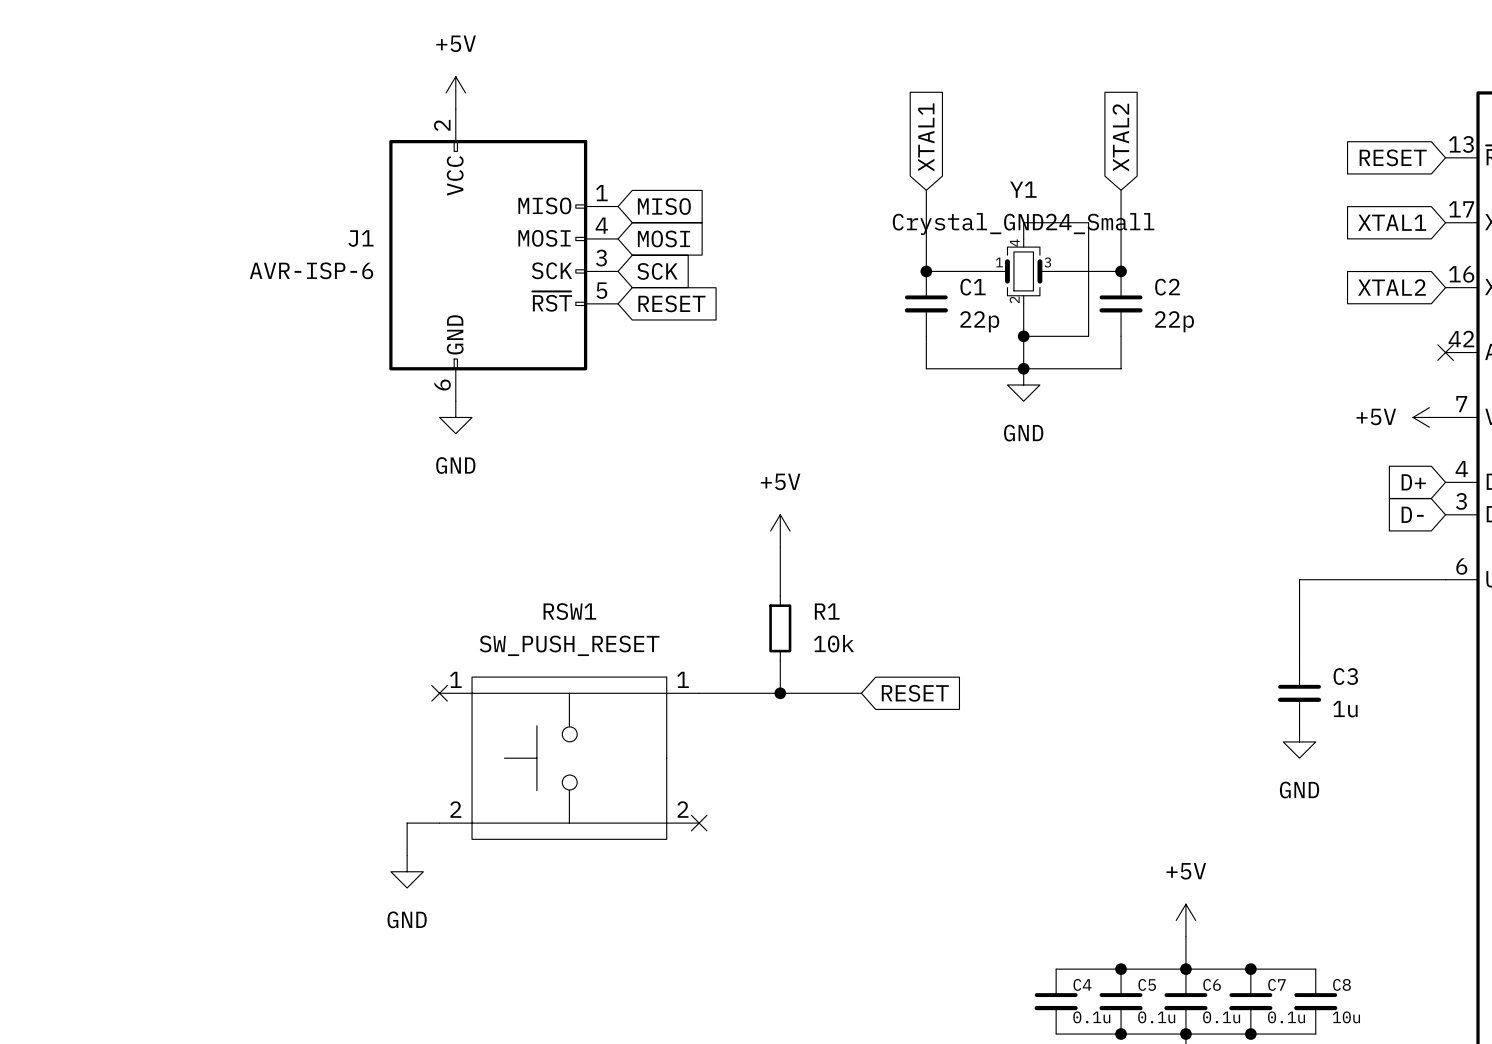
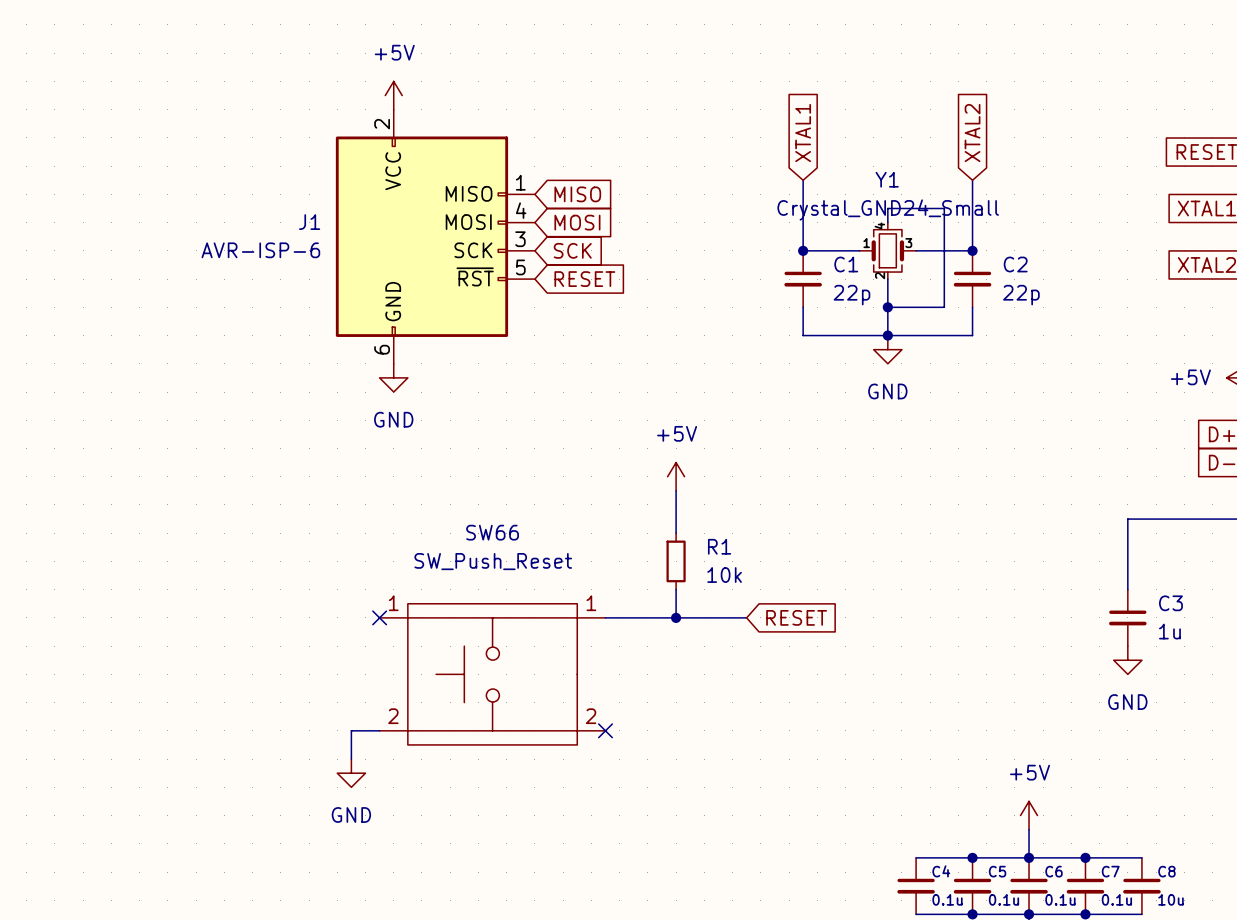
RSW1 name: RSW1 (569, 611) -> SW66 (492, 532)
RSW1 value: SW_PUSH_RESET (569, 645) -> SW_Push_Reset (493, 561)
RSW1 text: none -> 1 (393, 603)
RSW1 text: none -> 1 (591, 603)
RSW1 pin number: 1 (455, 679) -> none
RSW1 pin number: 1 (683, 679) -> none
RSW1 text: none -> 2 (393, 716)
RSW1 text: none -> 2 (591, 716)
RSW1 pin number: 2 (455, 809) -> none
RSW1 pin number: 2 (682, 809) -> none

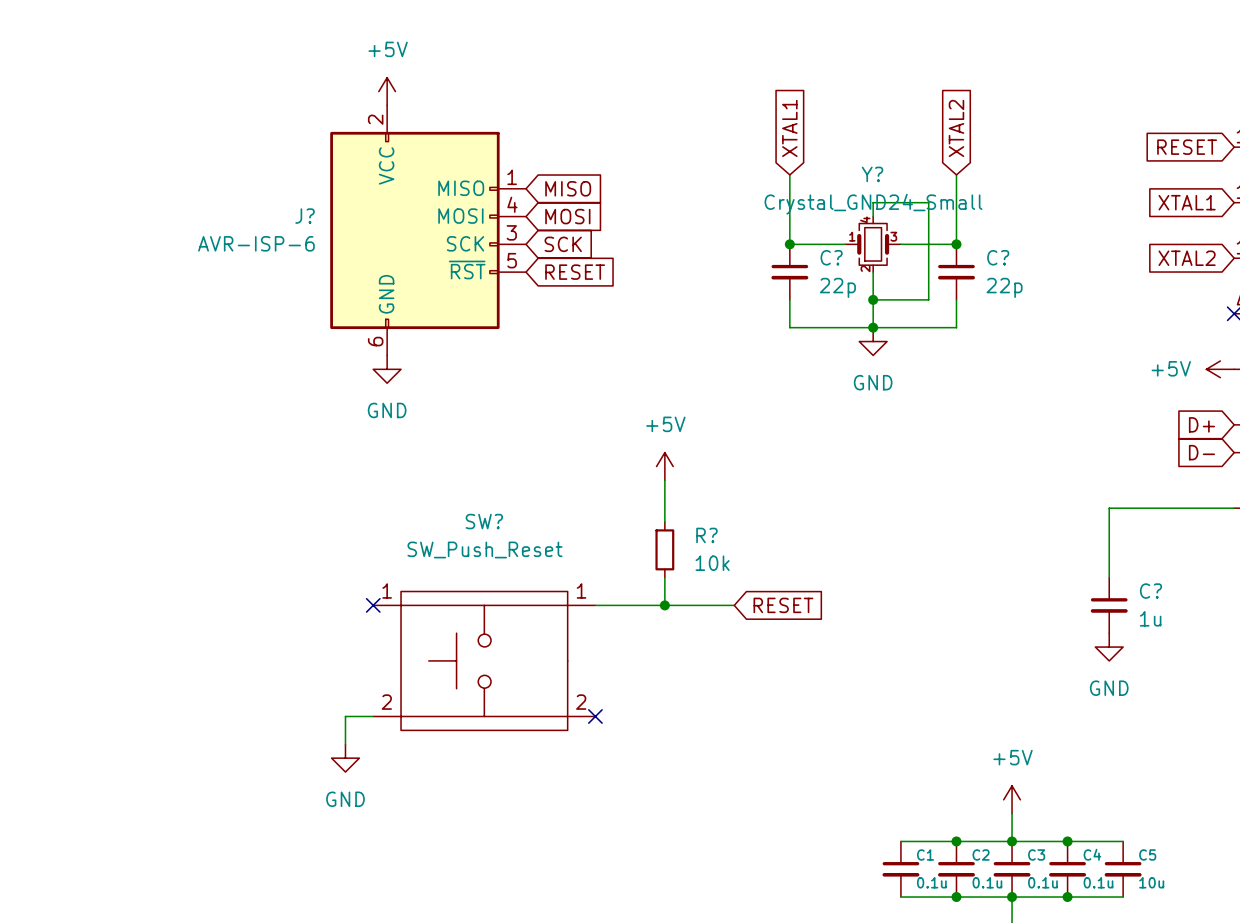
Y1 name: Y1 (887, 179) -> Y? (872, 174)
J1 name: J1 (309, 222) -> J? (305, 216)
C1 name: C1 (846, 264) -> C? (831, 257)
C2 name: C2 (1015, 264) -> C? (998, 257)
SW66 name: SW66 (492, 532) -> SW? (484, 521)
R1 name: R1 (719, 546) -> R? (706, 535)
C3 name: C3 (1170, 603) -> C? (1151, 591)
C4 name: C4 (941, 871) -> C1 (925, 854)
C5 name: C5 (997, 871) -> C2 (981, 854)
C6 name: C6 (1054, 871) -> C3 (1036, 854)
C7 name: C7 (1110, 871) -> C4 (1092, 854)
C8 name: C8 (1166, 871) -> C5 (1147, 854)

